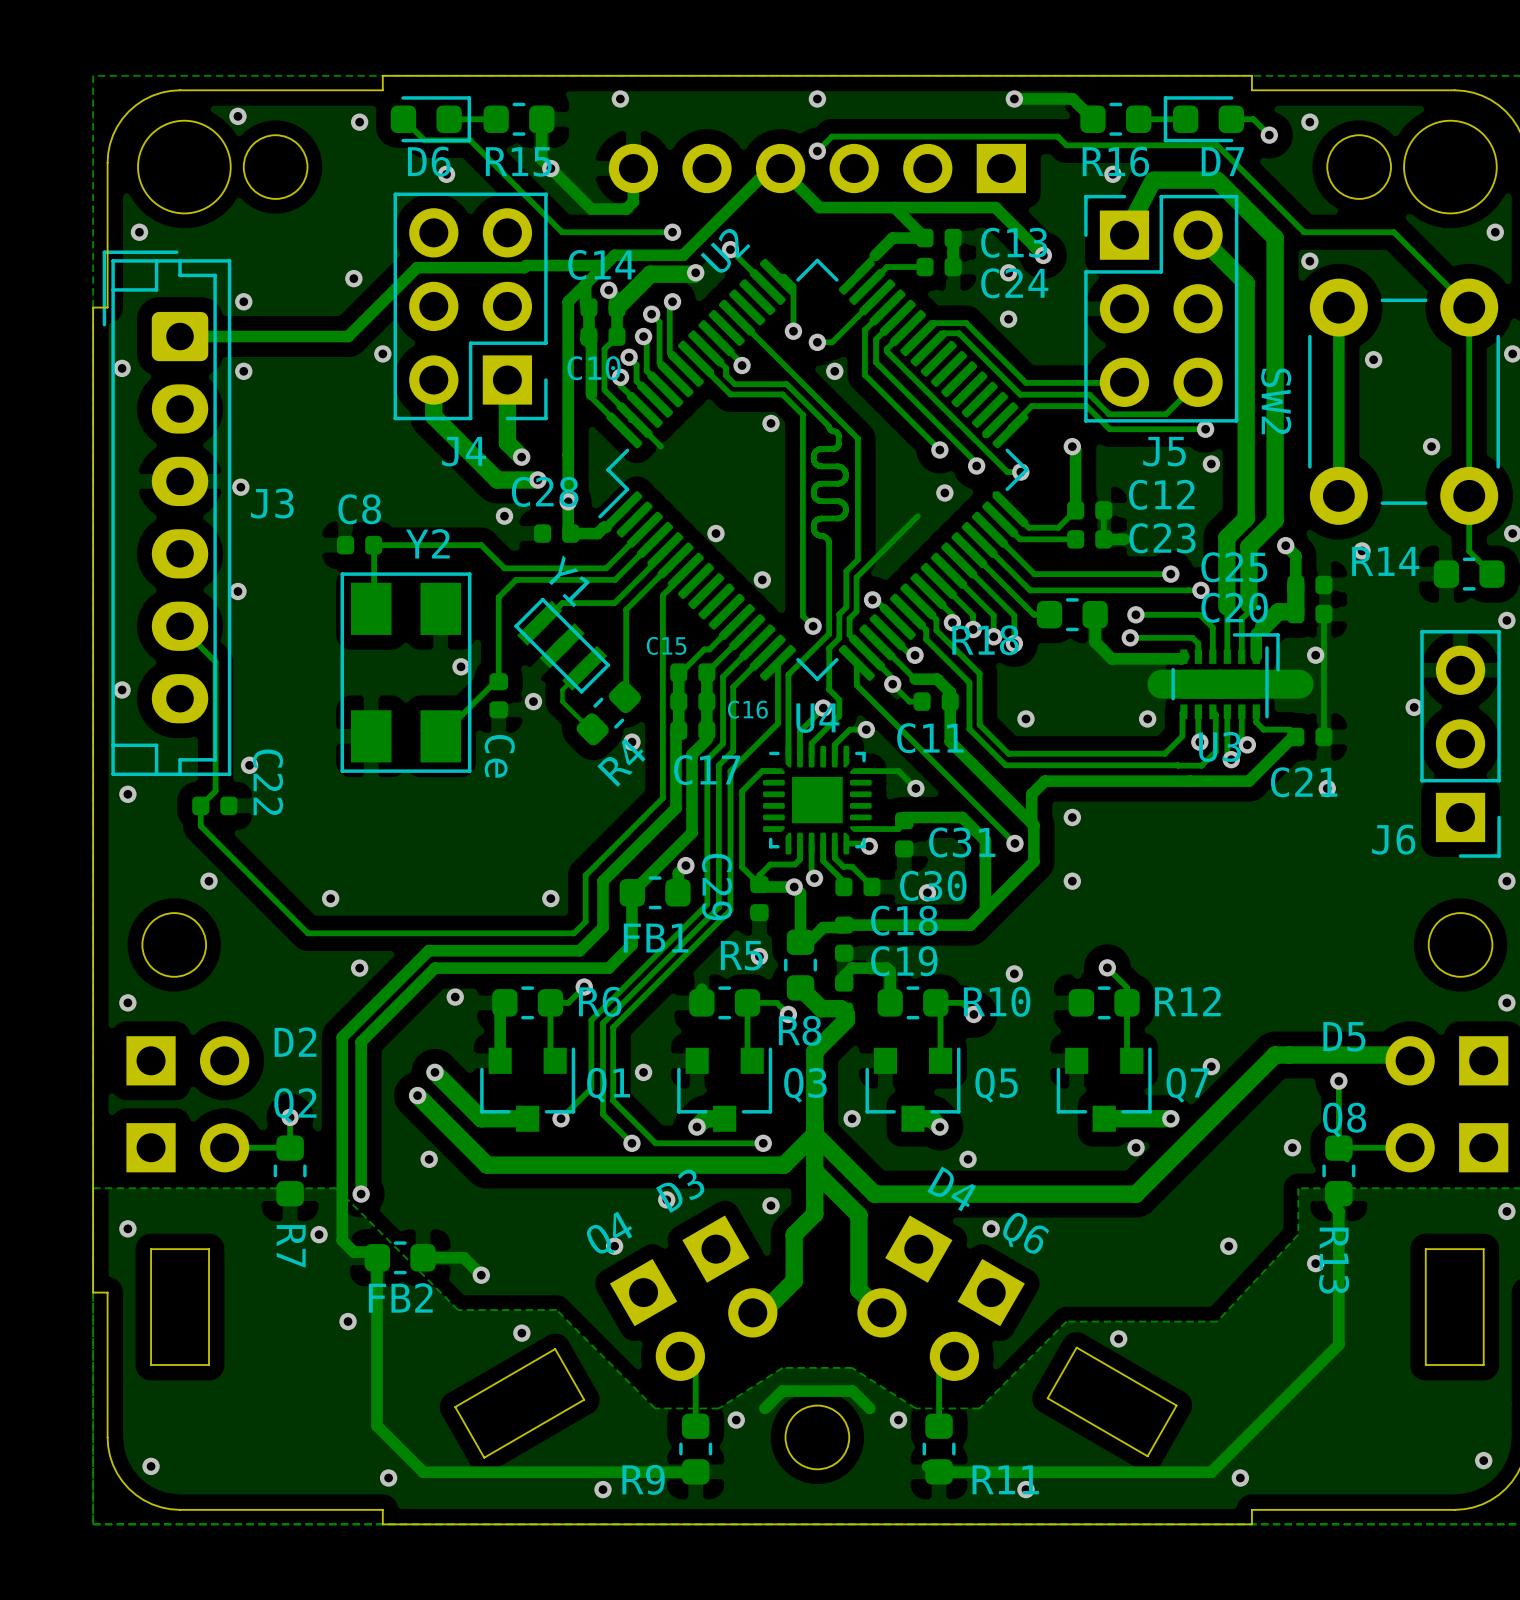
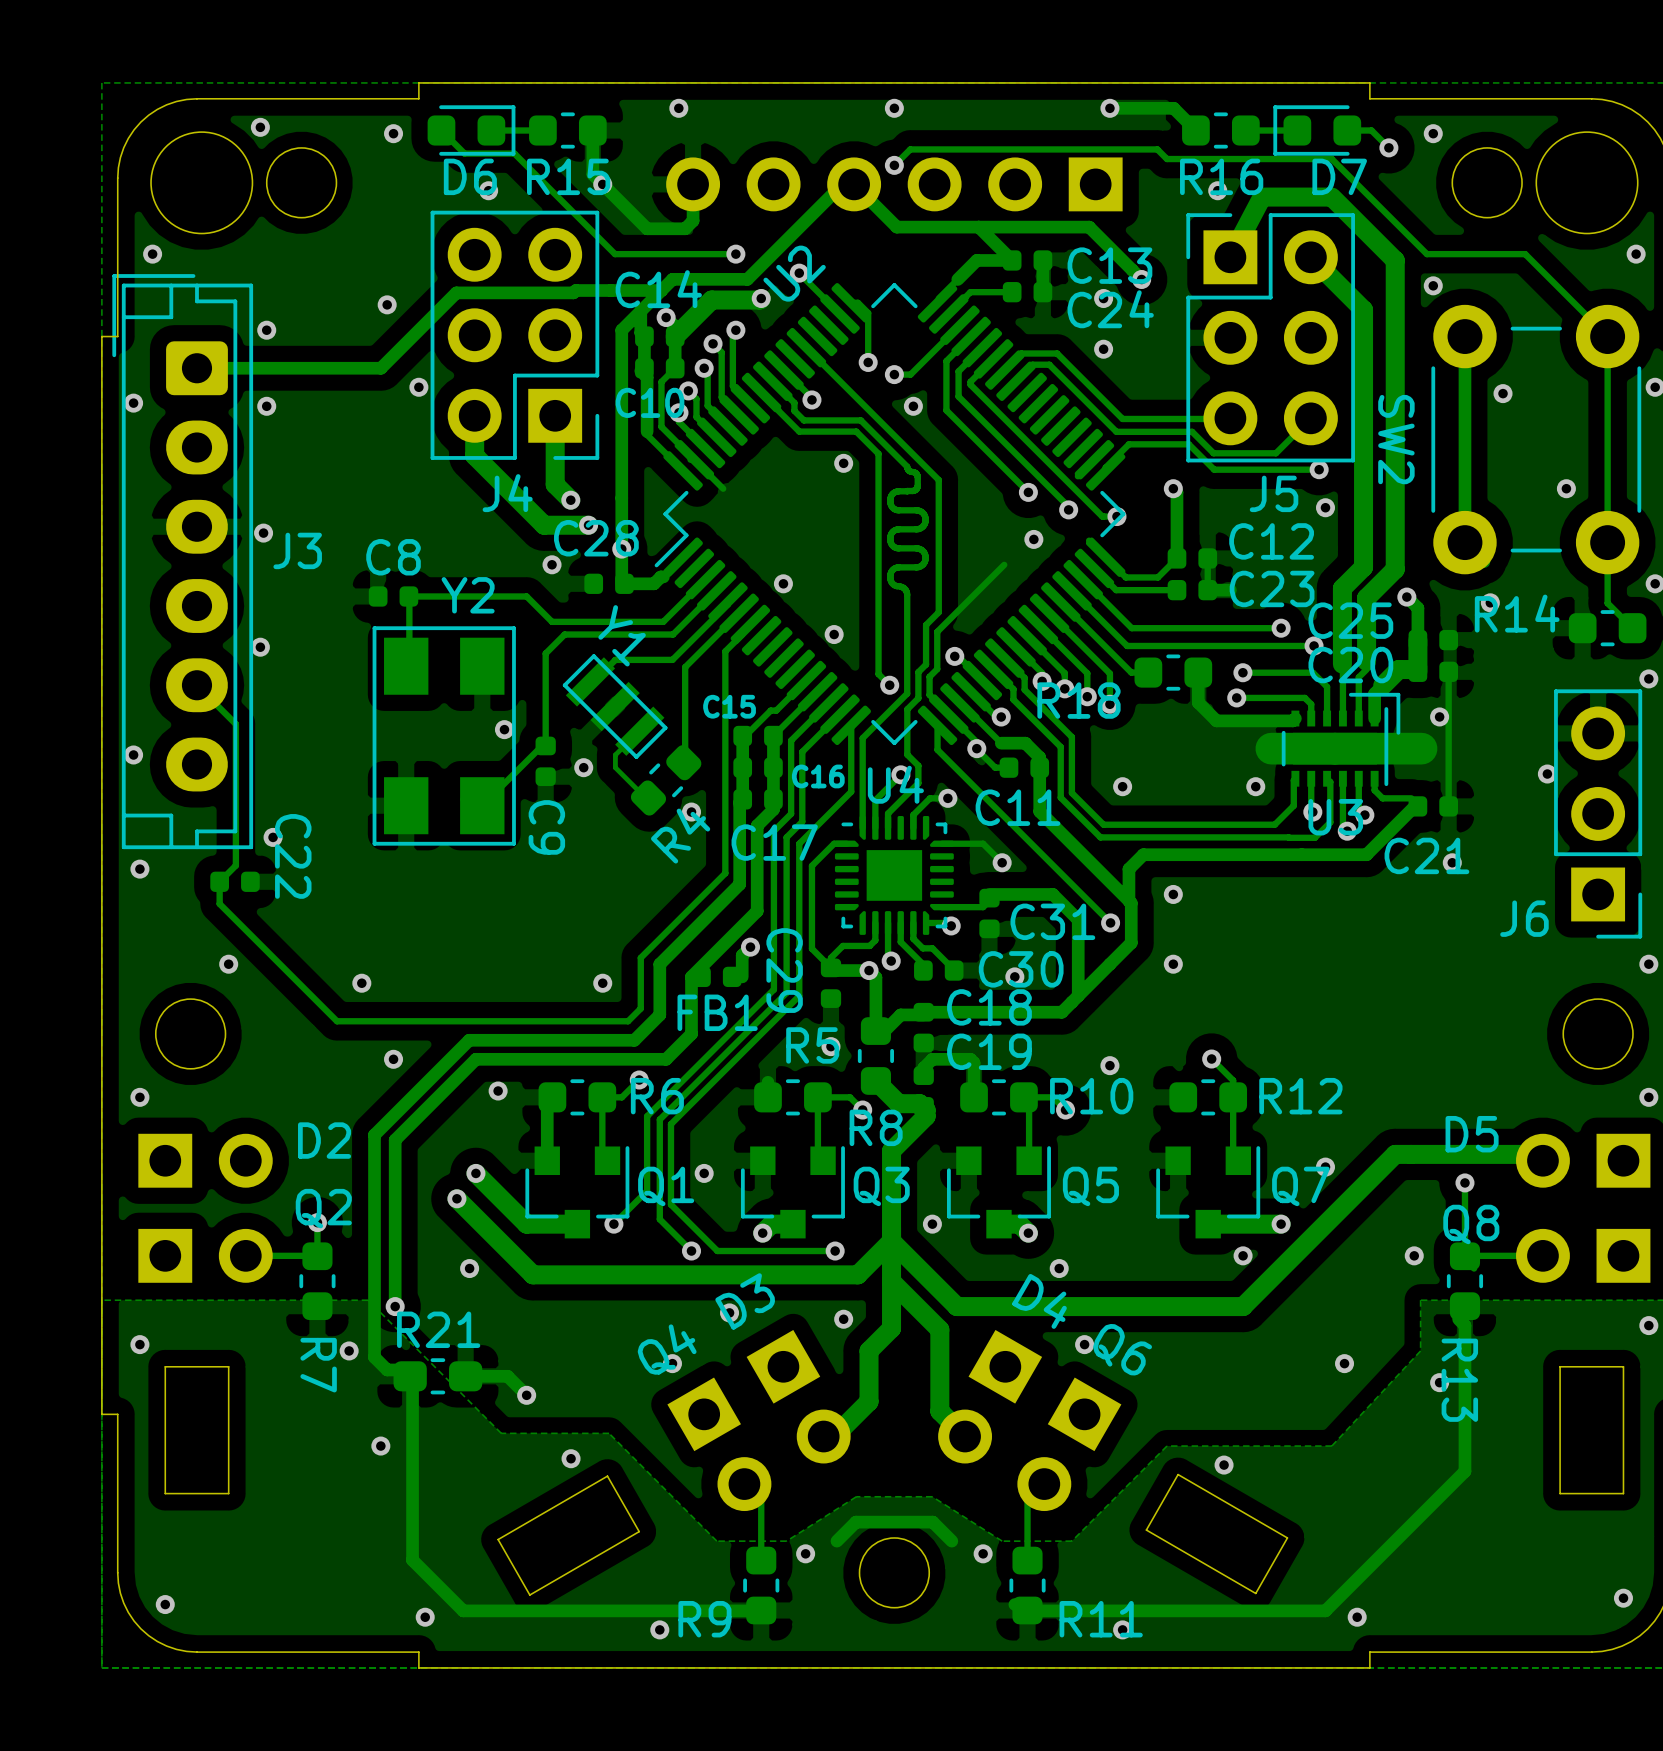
Ce name: Ce (499, 756) -> C9 (546, 827)
FB1 footprint: [619, 876, 691, 910] -> [692, 966, 742, 988]
FB2: (400, 1257) -> none
R21: none -> (437, 1376)

